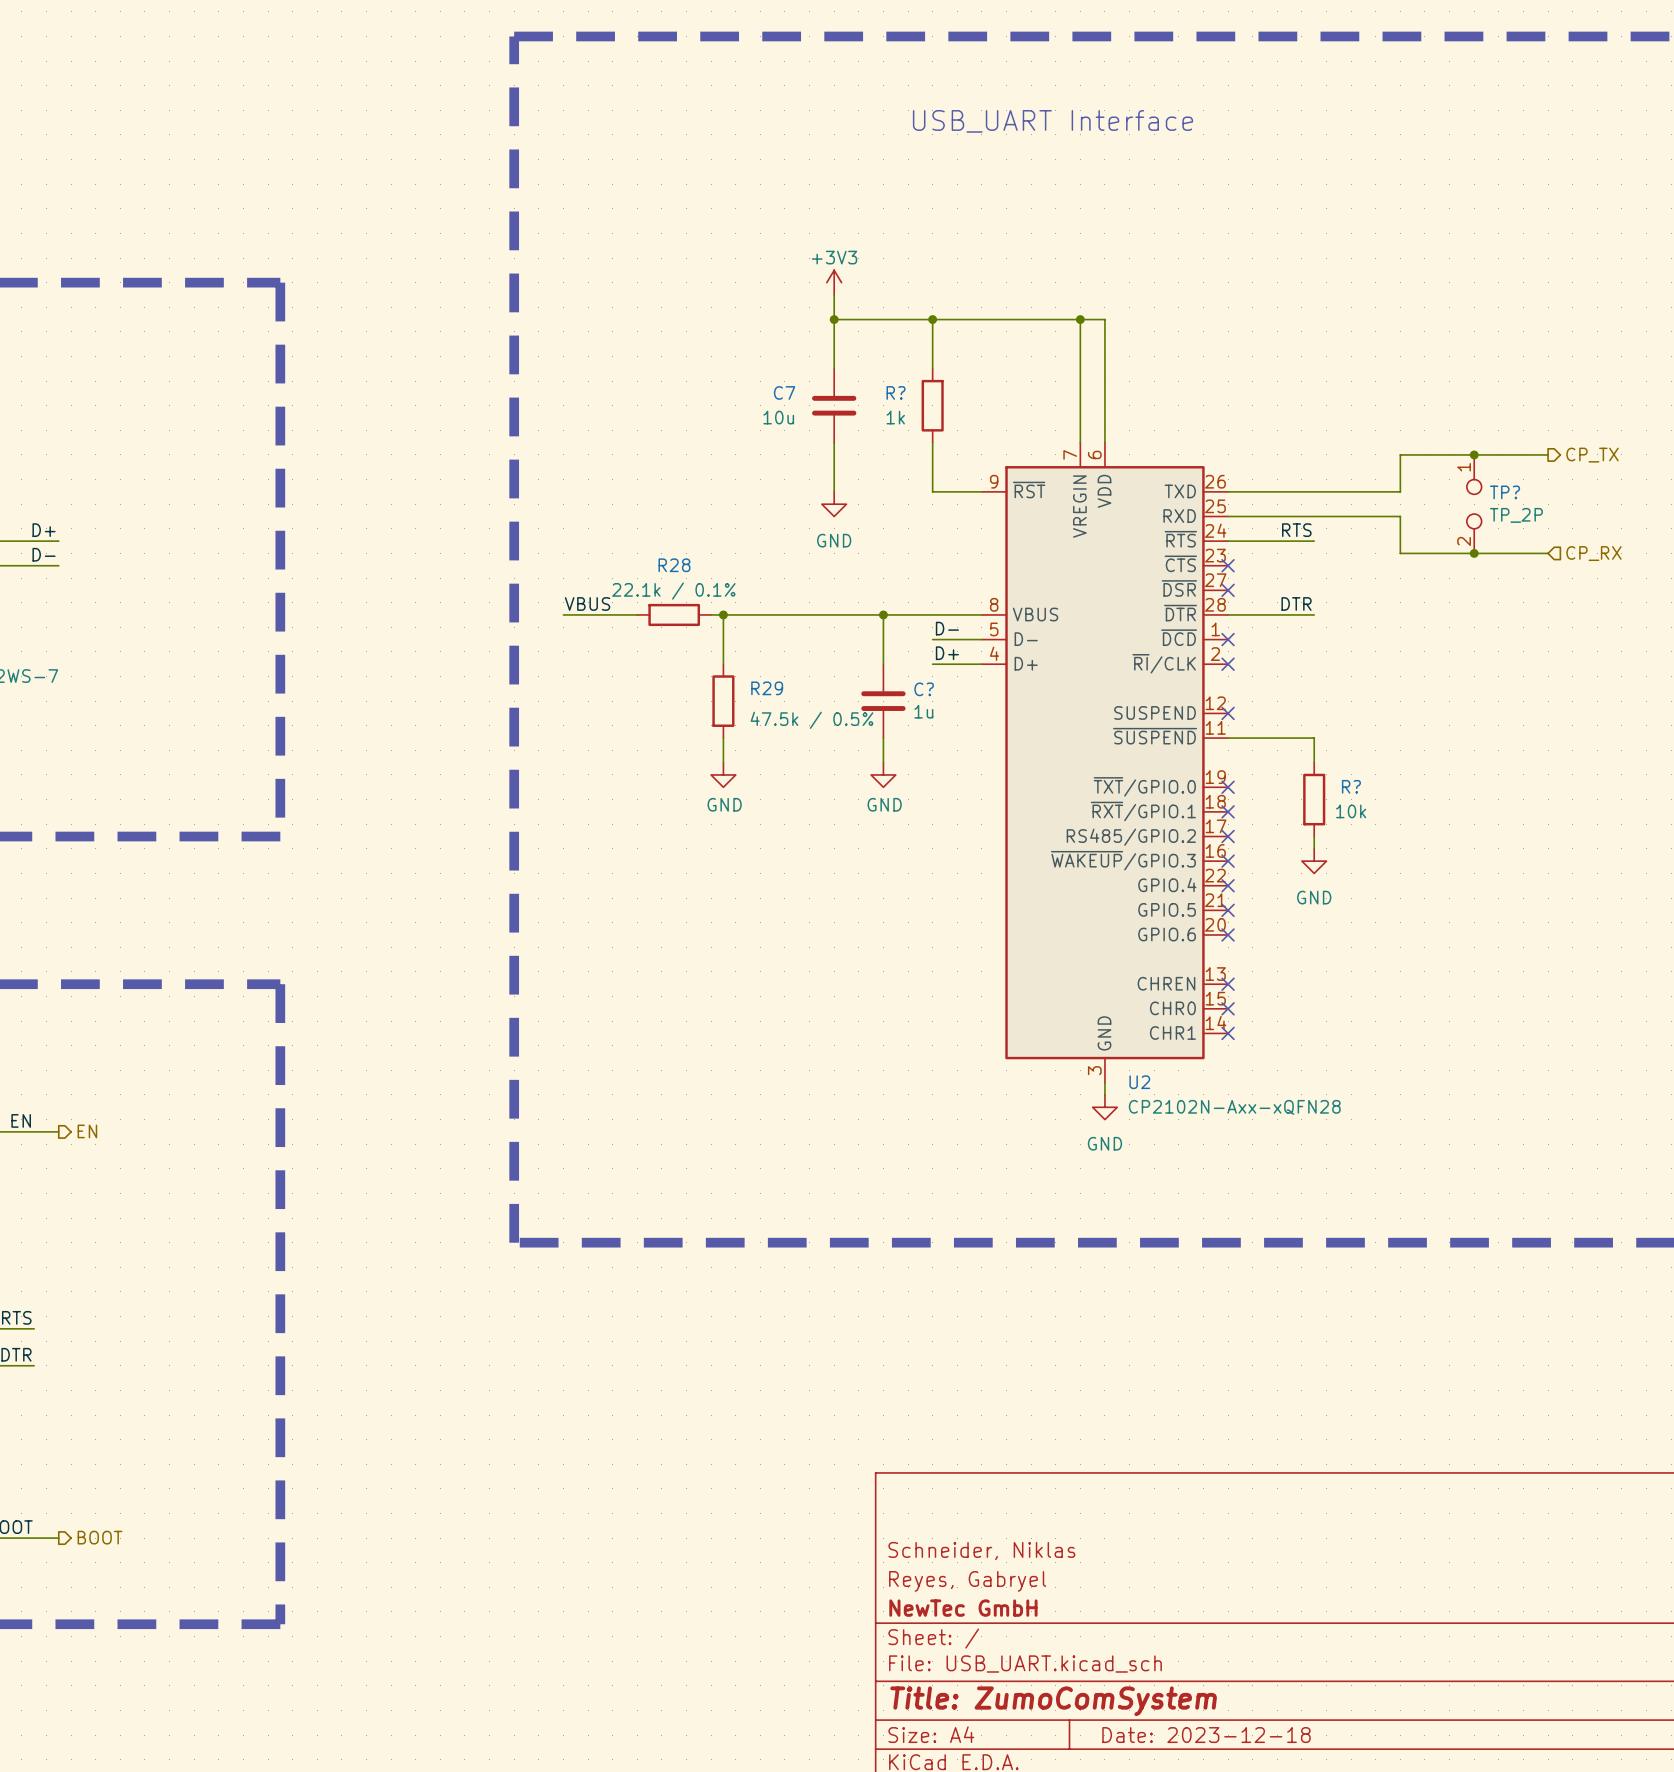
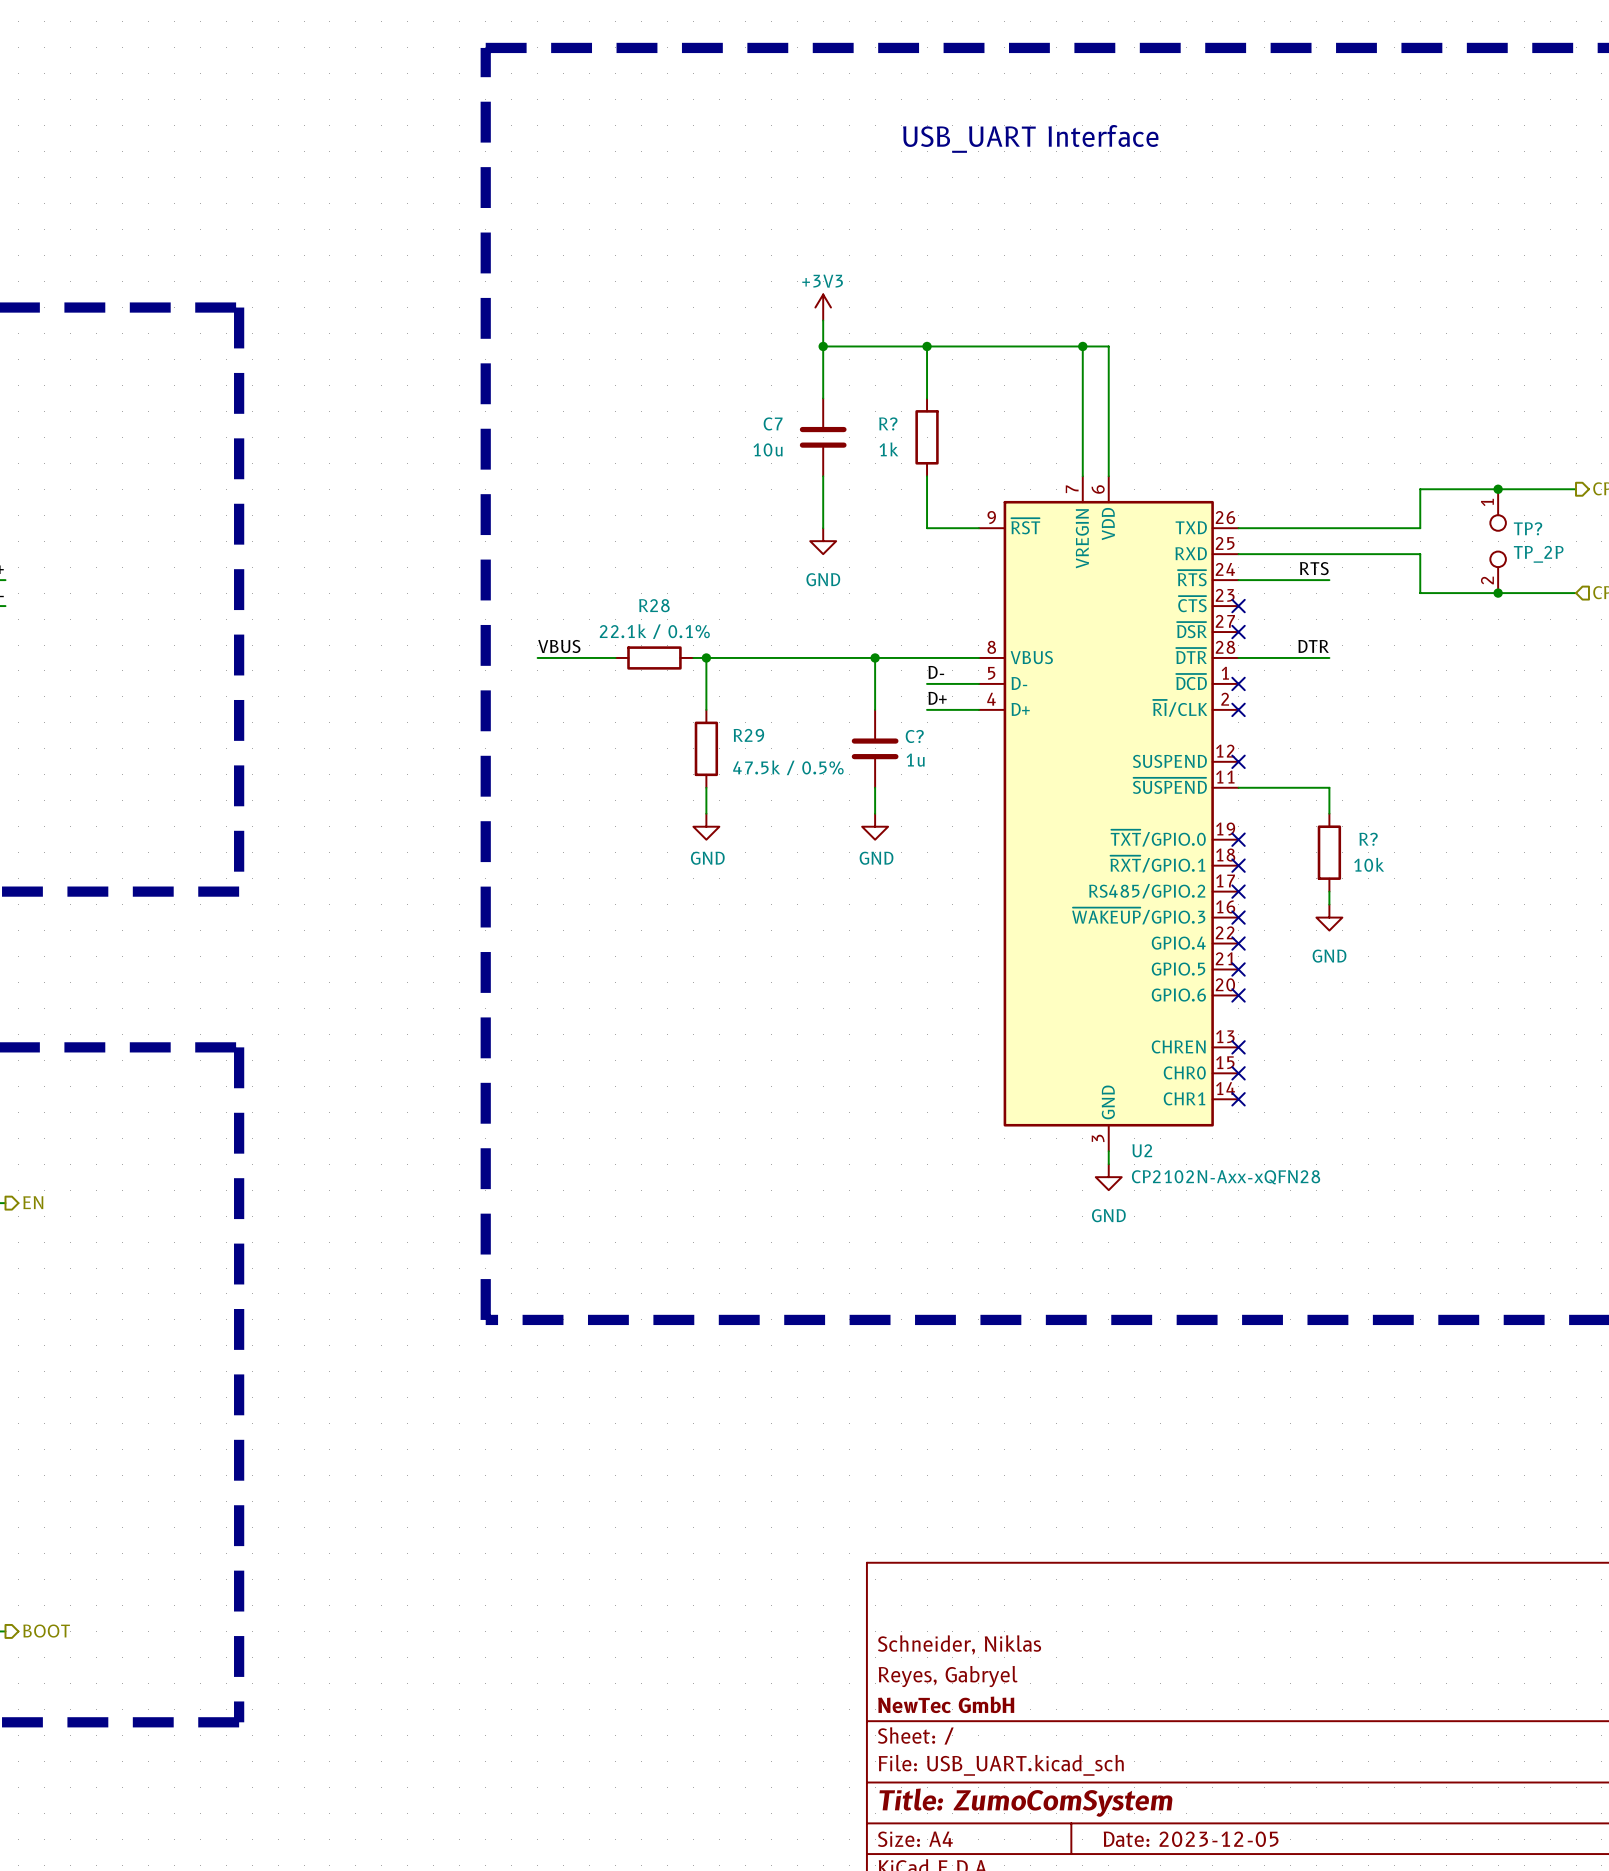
title block: Date: 2023-12-18 (1206, 1735) -> Date: 2023-12-05 (1191, 1839)

